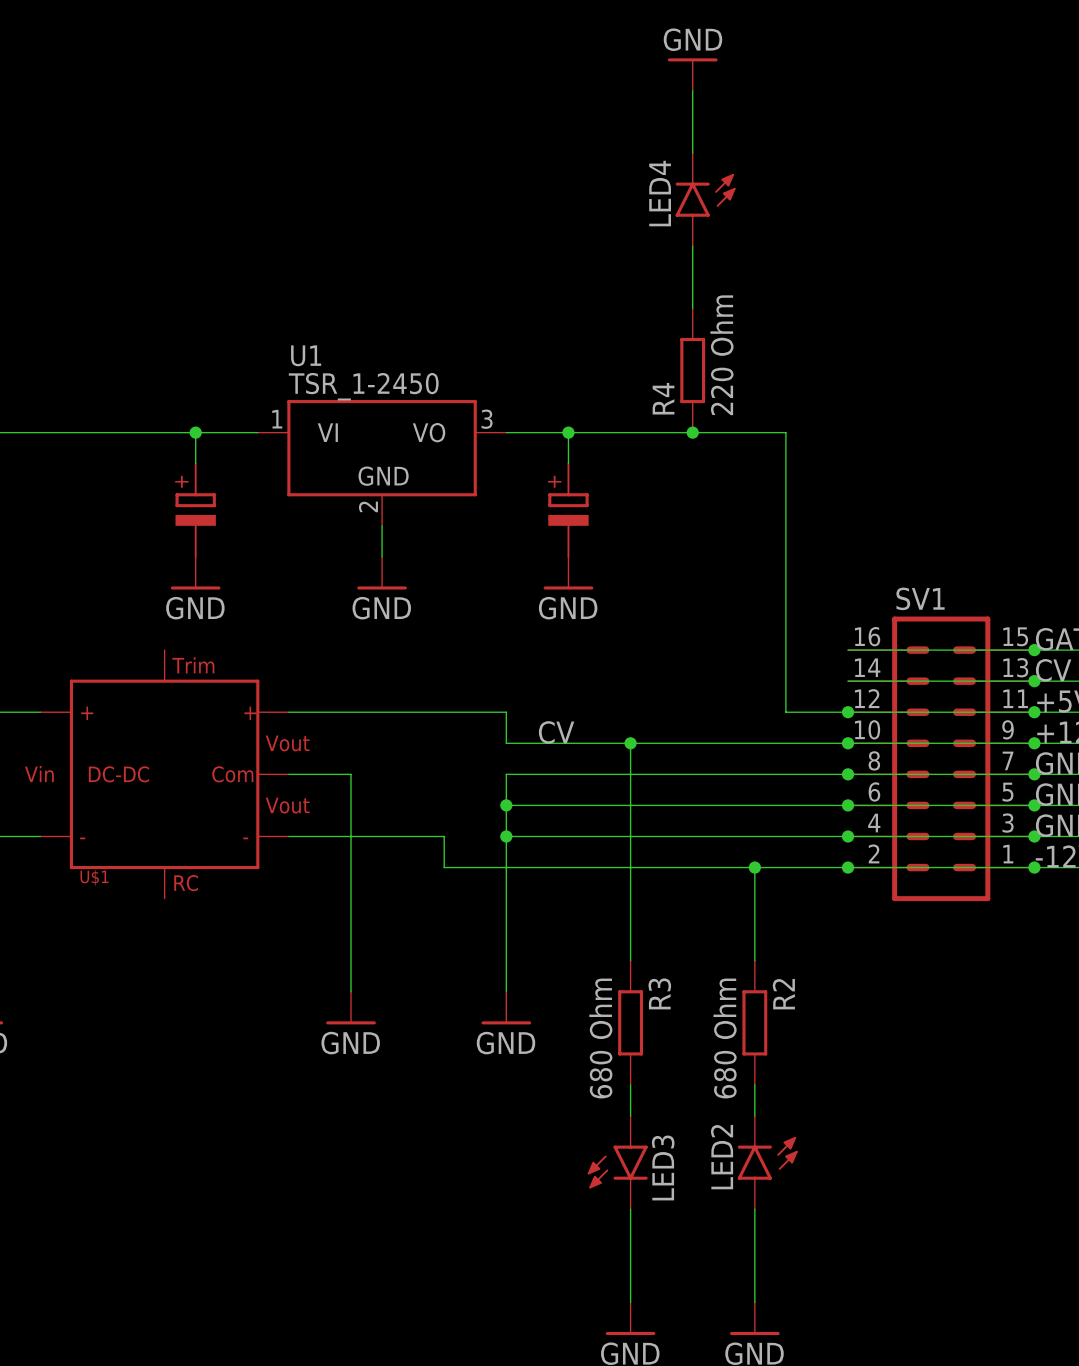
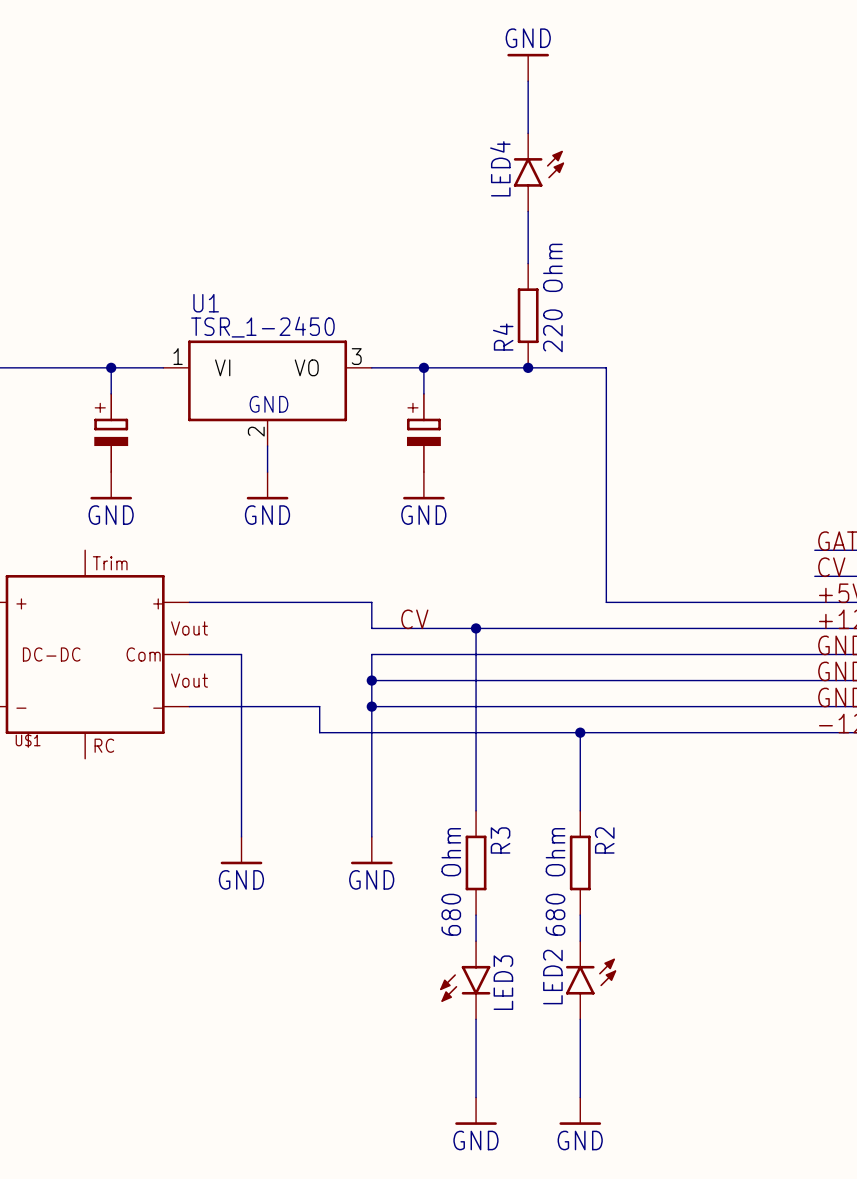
wire: (848, 650) (1034, 650) -> none
junction: (1034, 650) -> none
wire: (848, 681) (1034, 681) -> none
junction: (1034, 681) -> none
junction: (848, 712) -> none
junction: (1034, 712) -> none
junction: (848, 743) -> none
junction: (1034, 743) -> none
SV1: (941, 758) -> none
junction: (848, 774) -> none
junction: (1034, 774) -> none
junction: (848, 805) -> none
junction: (1034, 805) -> none
junction: (848, 836) -> none
junction: (1034, 836) -> none
junction: (848, 867) -> none
junction: (1034, 867) -> none

